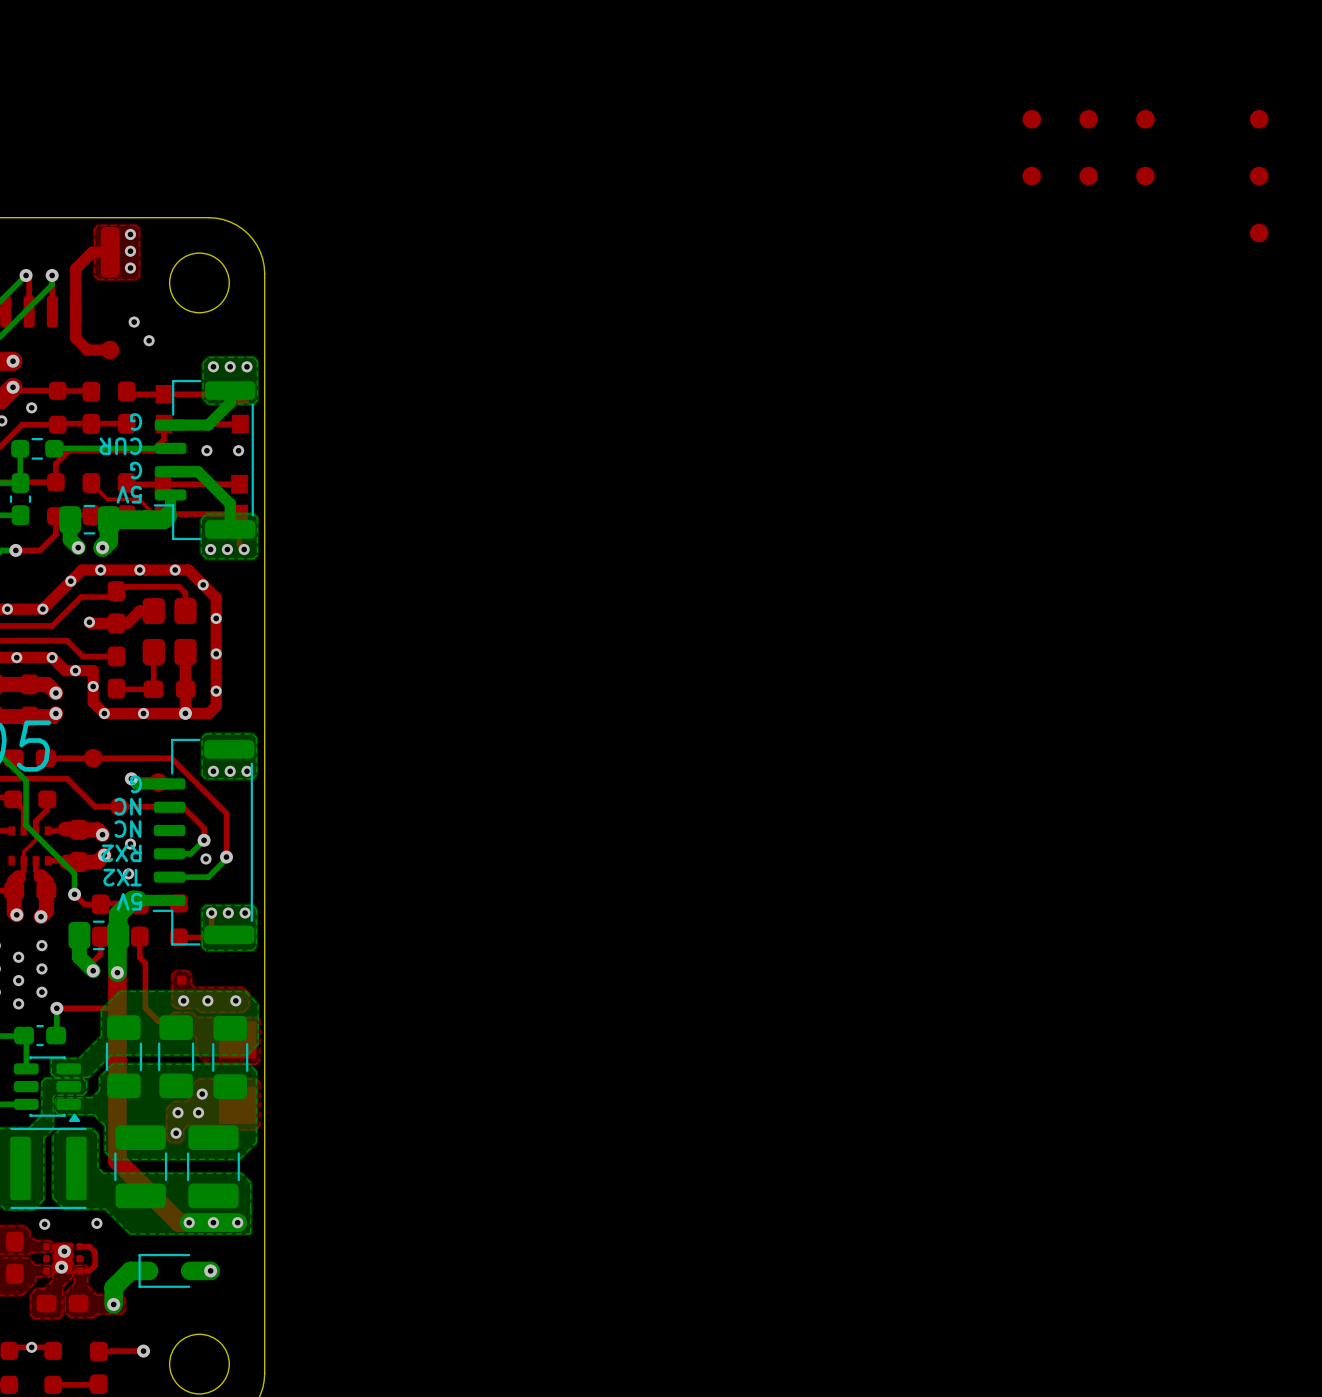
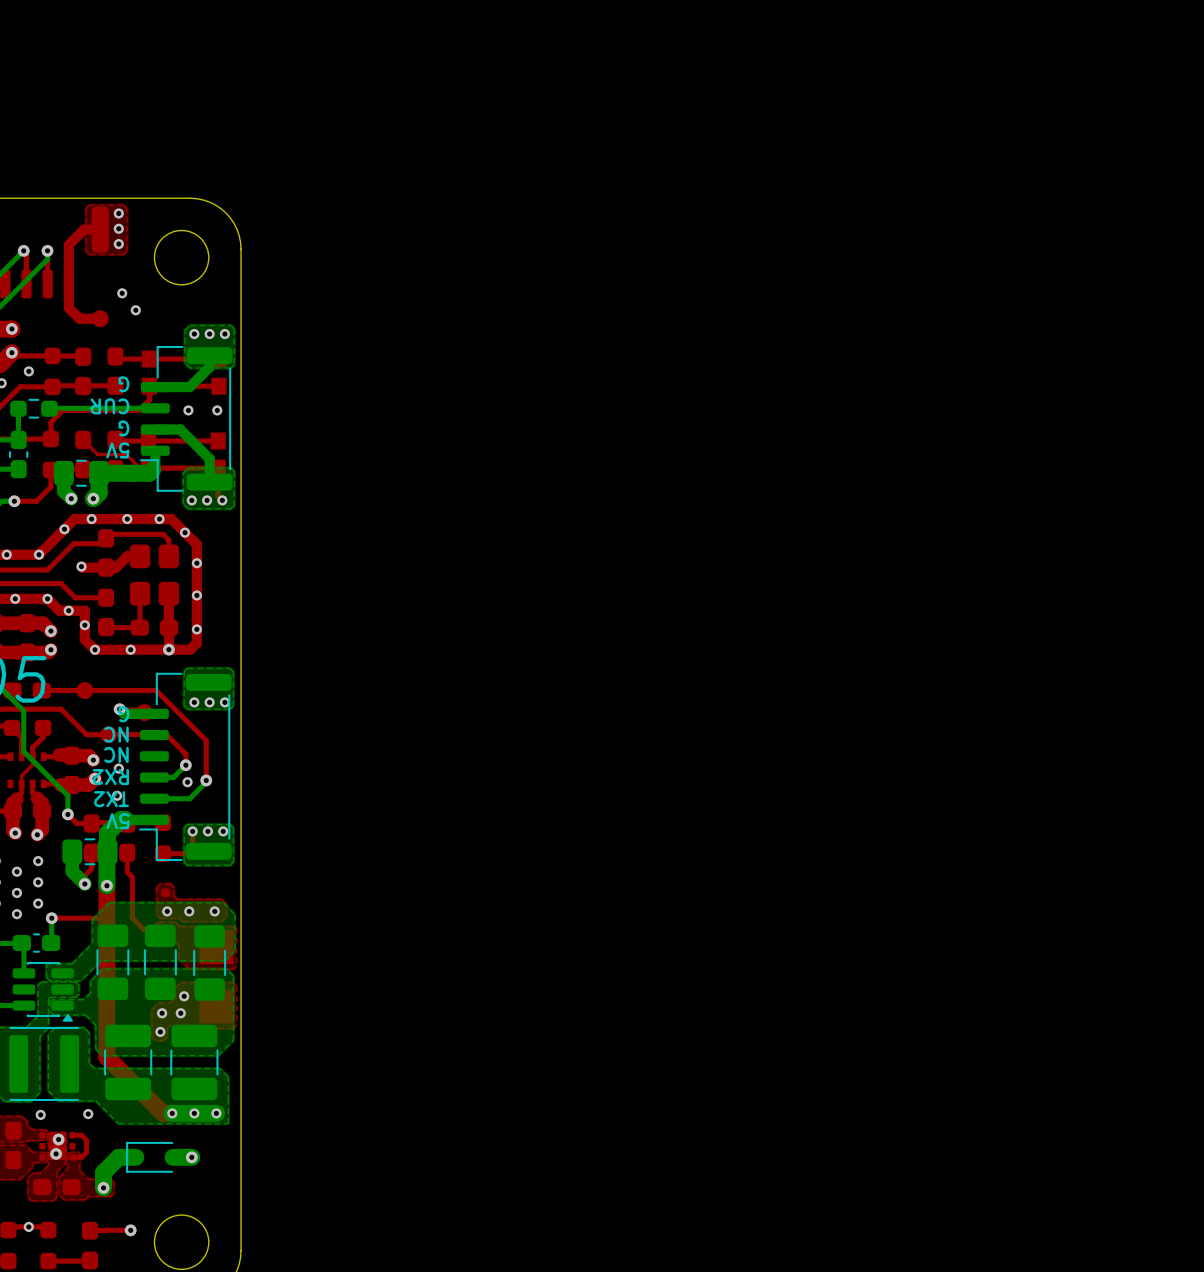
part: (1031, 119) -> none
part: (1088, 119) -> none
part: (1145, 119) -> none
part: (1259, 119) -> none
part: (1031, 176) -> none
part: (1088, 176) -> none
part: (1145, 176) -> none
part: (1259, 176) -> none
part: (1259, 232) -> none

